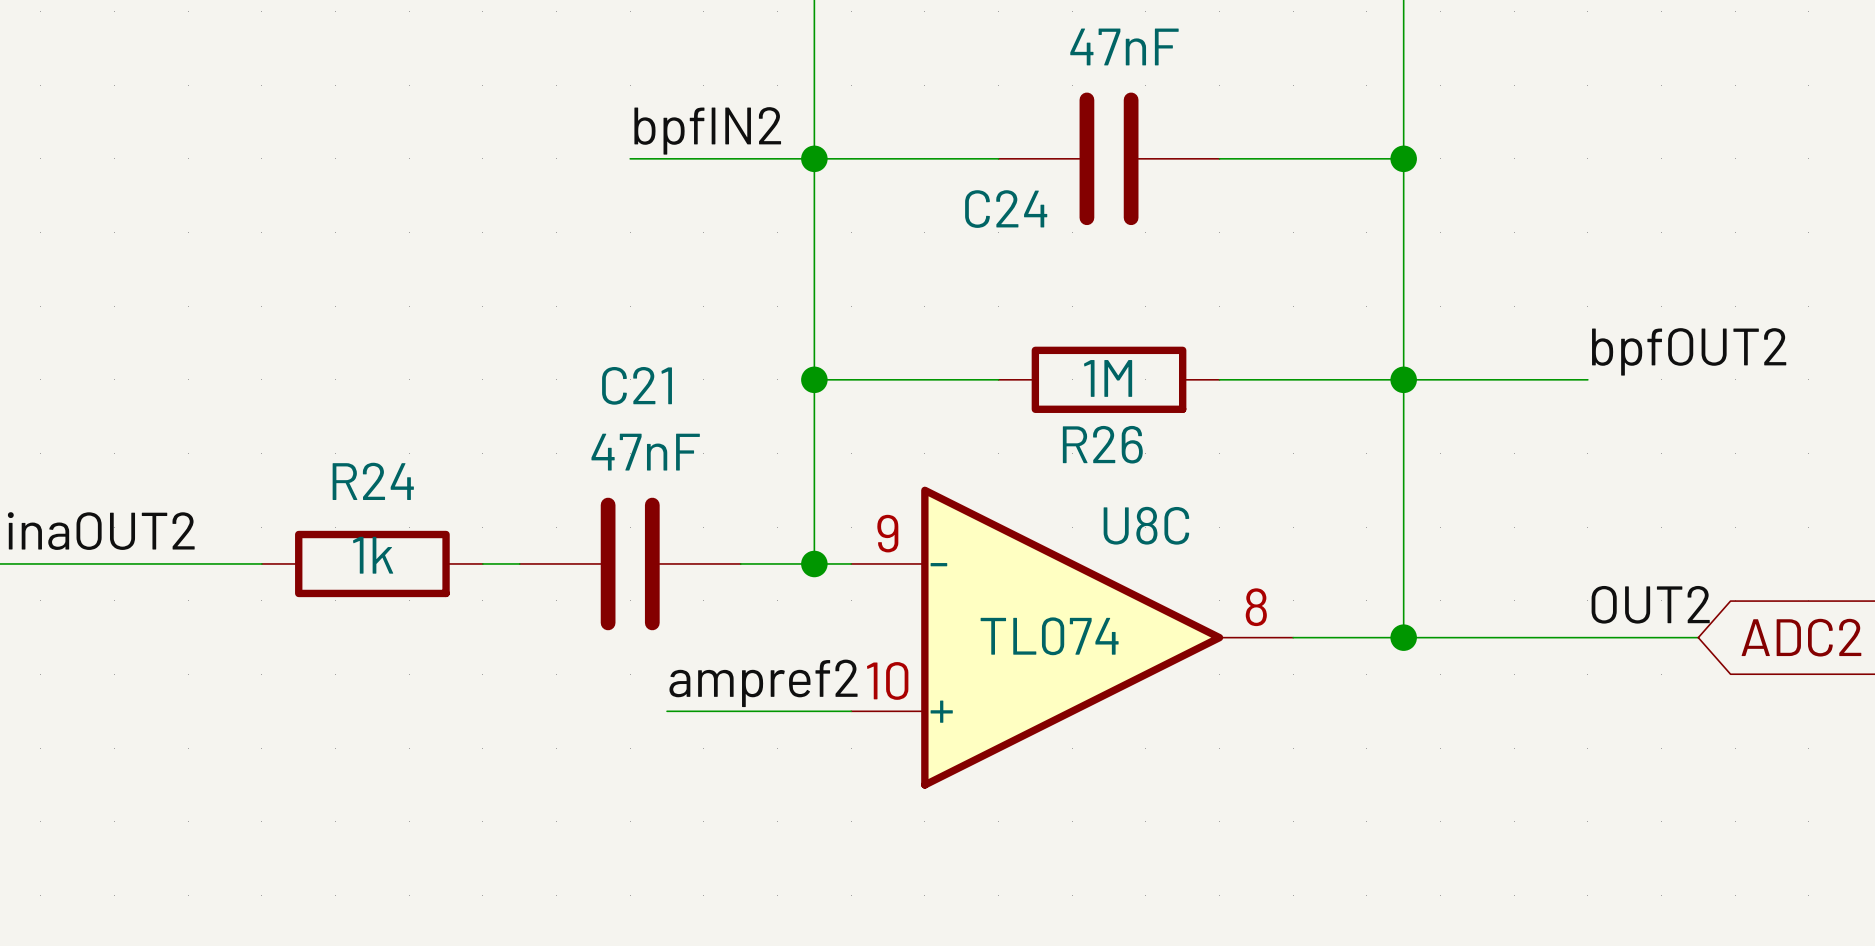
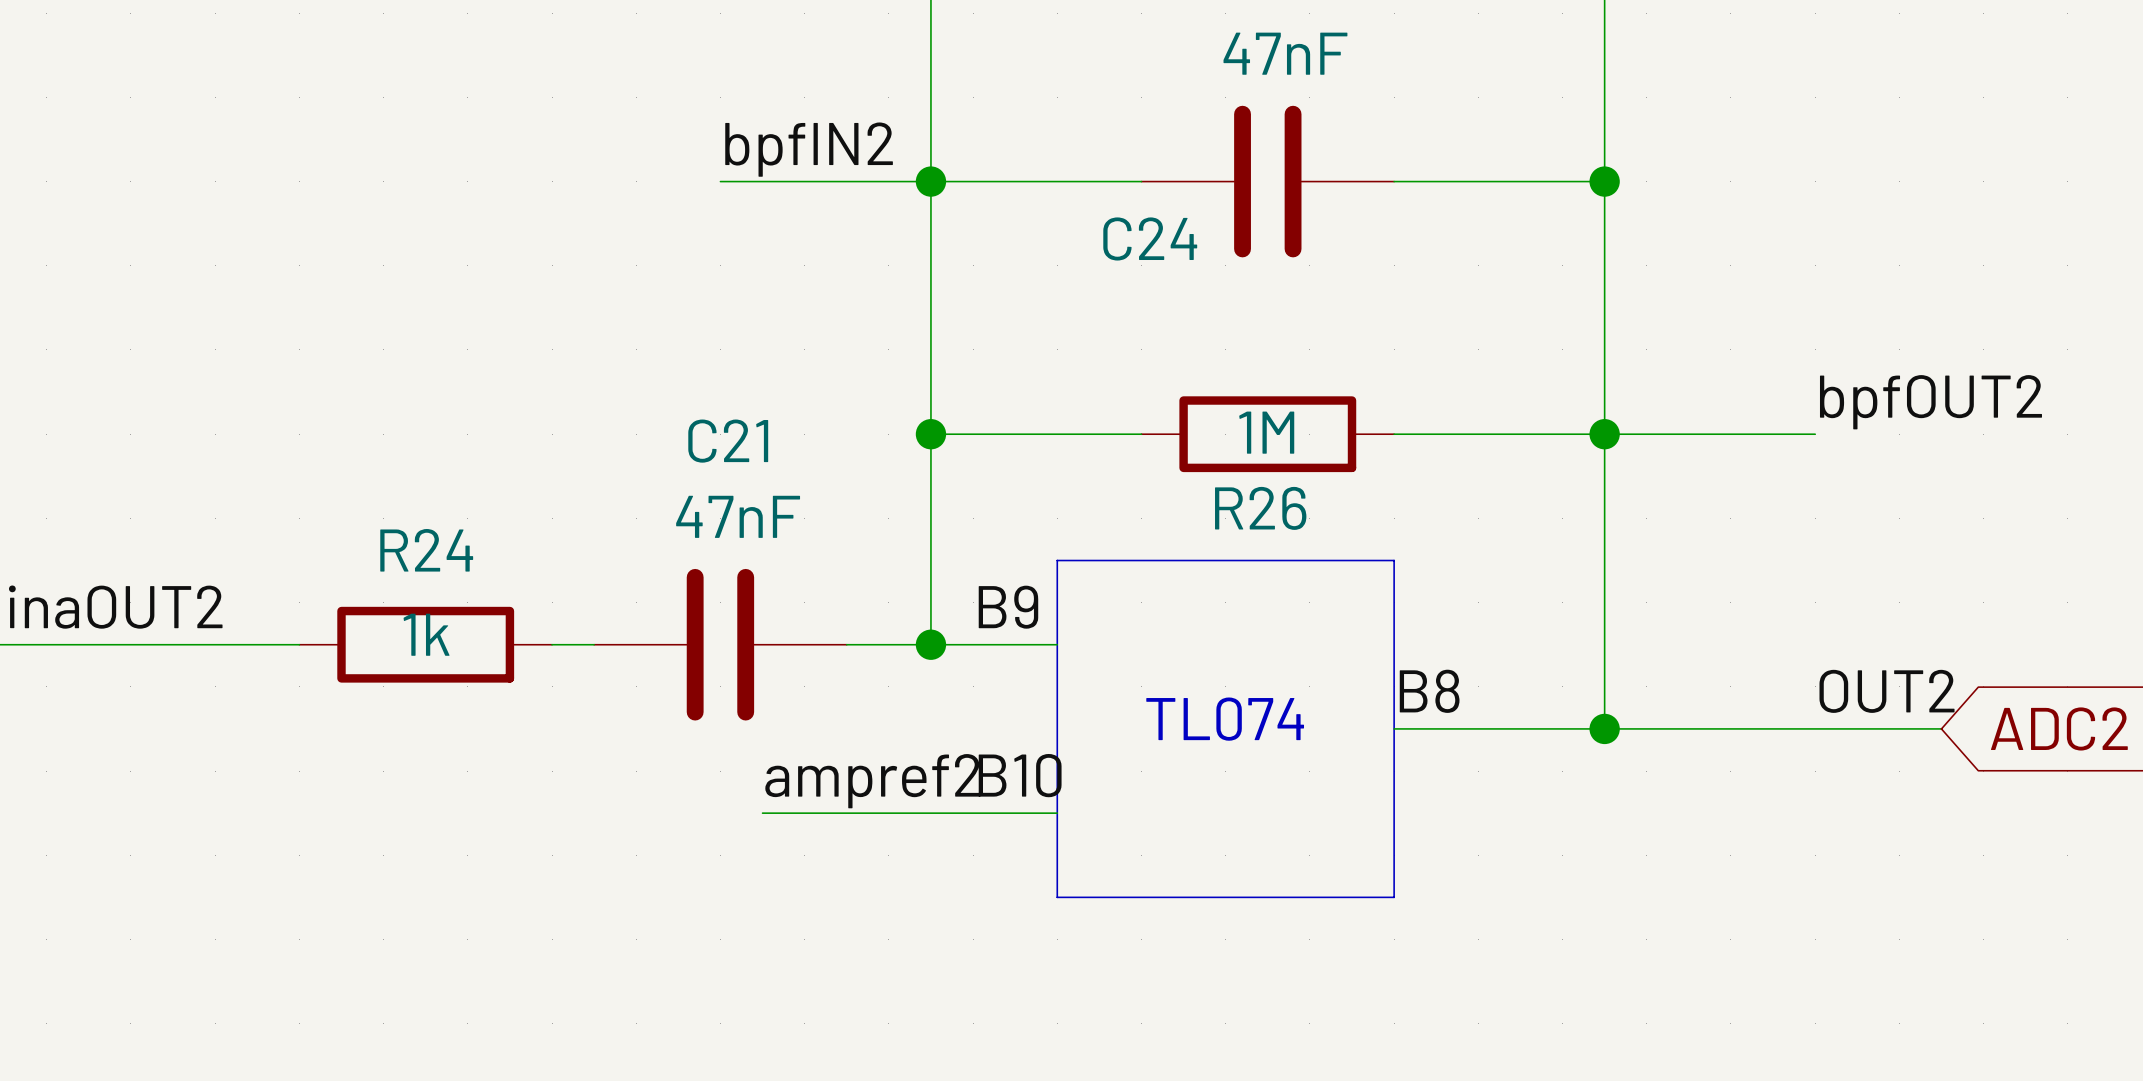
line: none -> (1057, 560) (1394, 560) (1394, 897) (1057, 897) (1057, 560)
label: none -> B9 (1008, 607)
label: none -> B8 (1429, 691)
text: none -> TL074 (1225, 719)
U8C: TL074 (1072, 637) -> none
label: none -> B10 (1020, 775)

